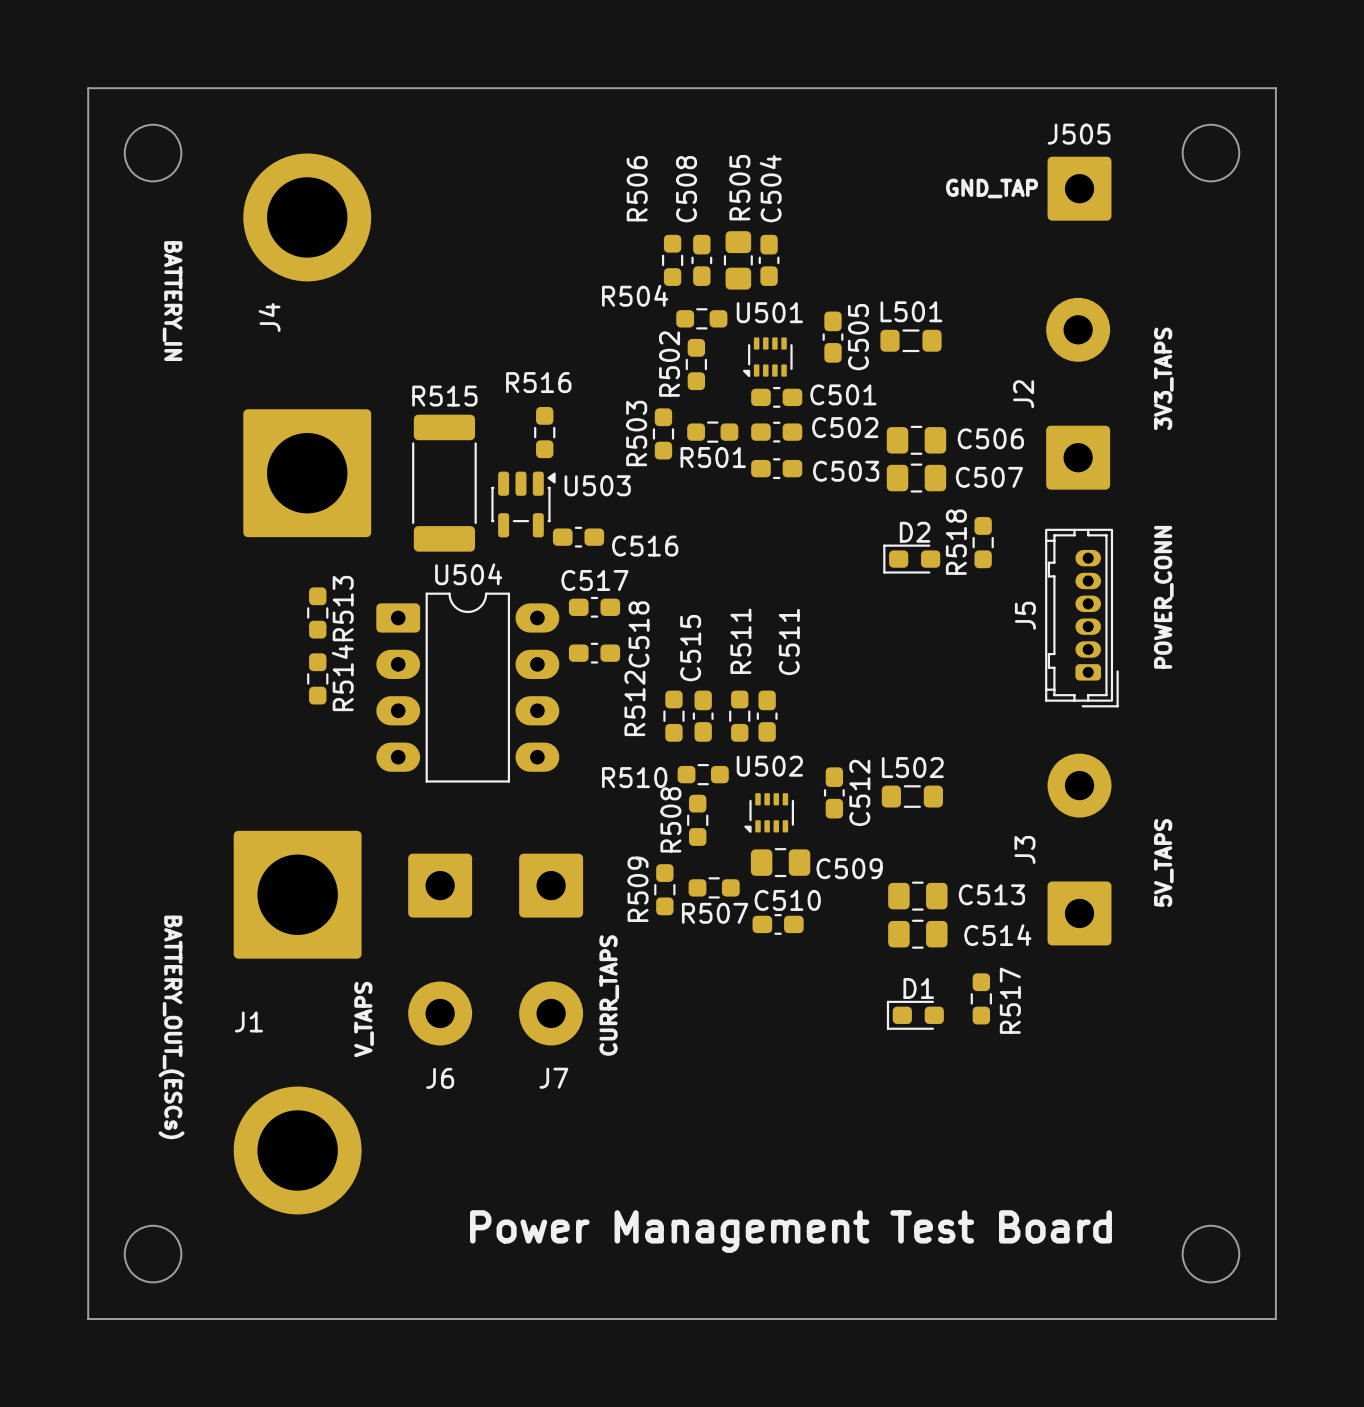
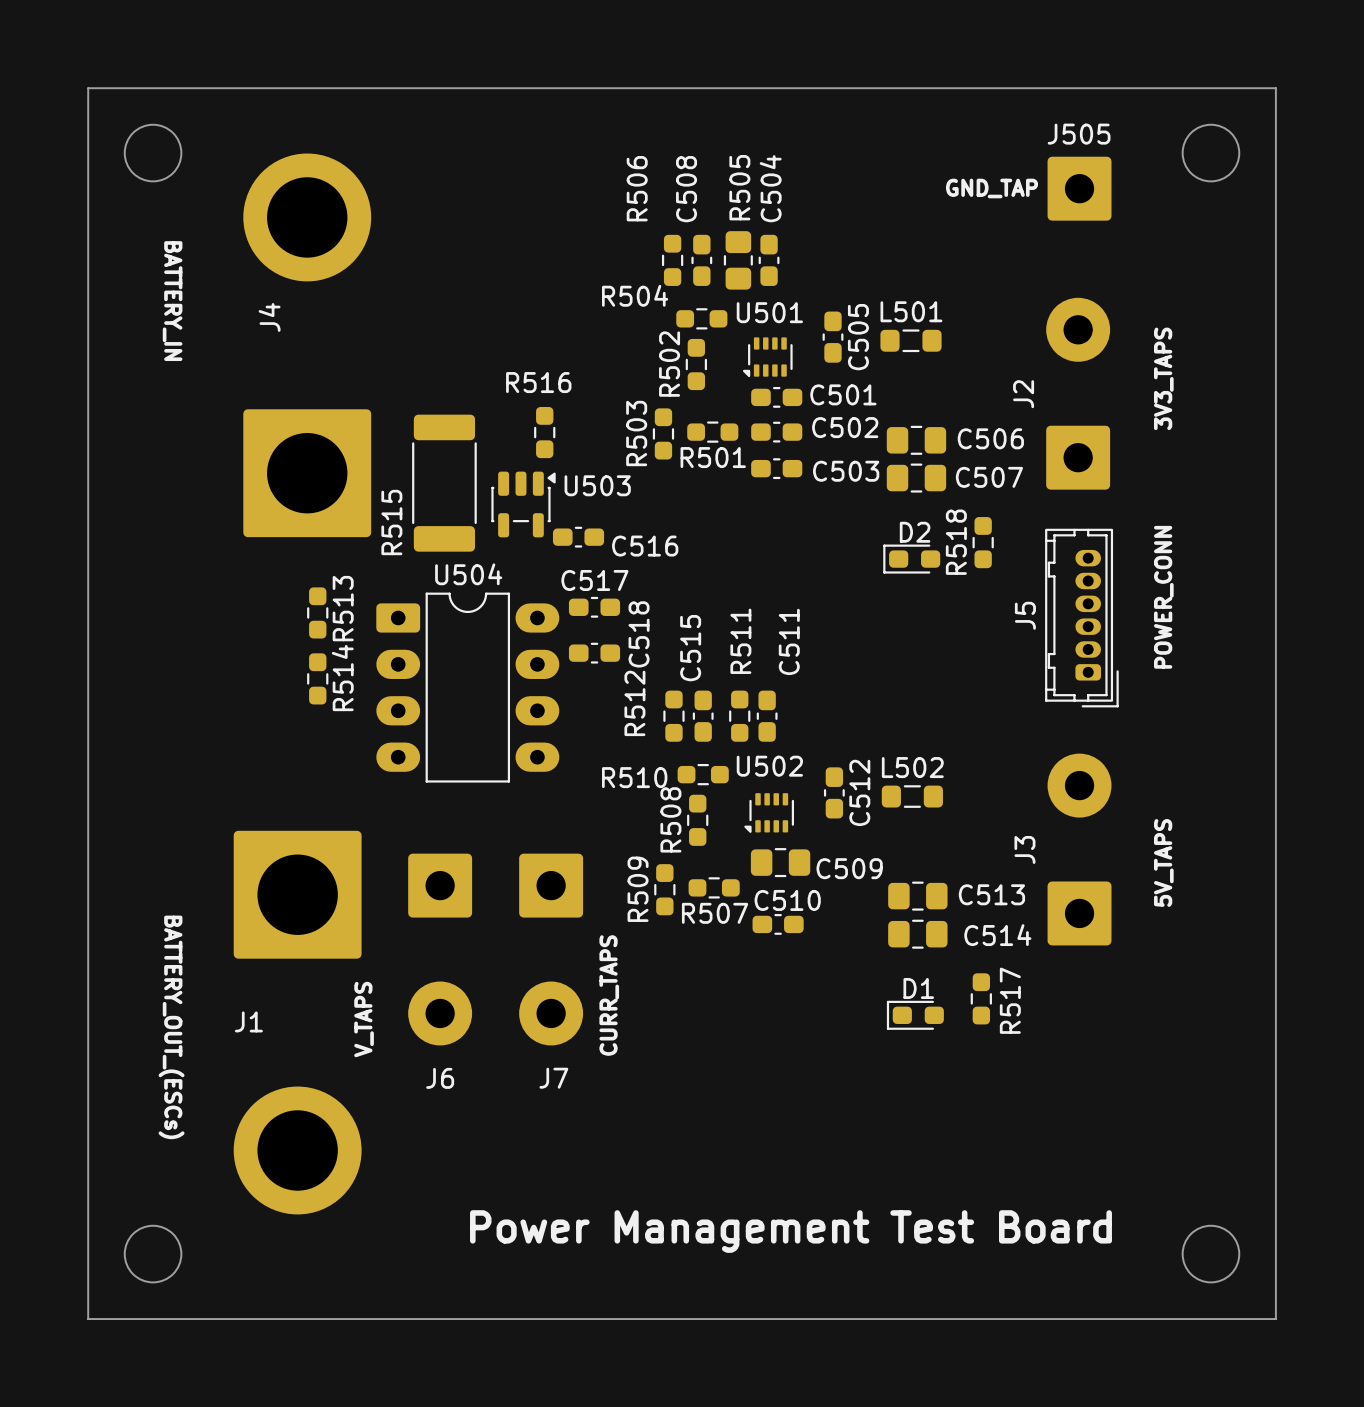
R515 name rotation: 0° (444, 396) -> 90° counterclockwise (391, 522)
R515 name position: R515 (444, 396) -> R515 (391, 522)

